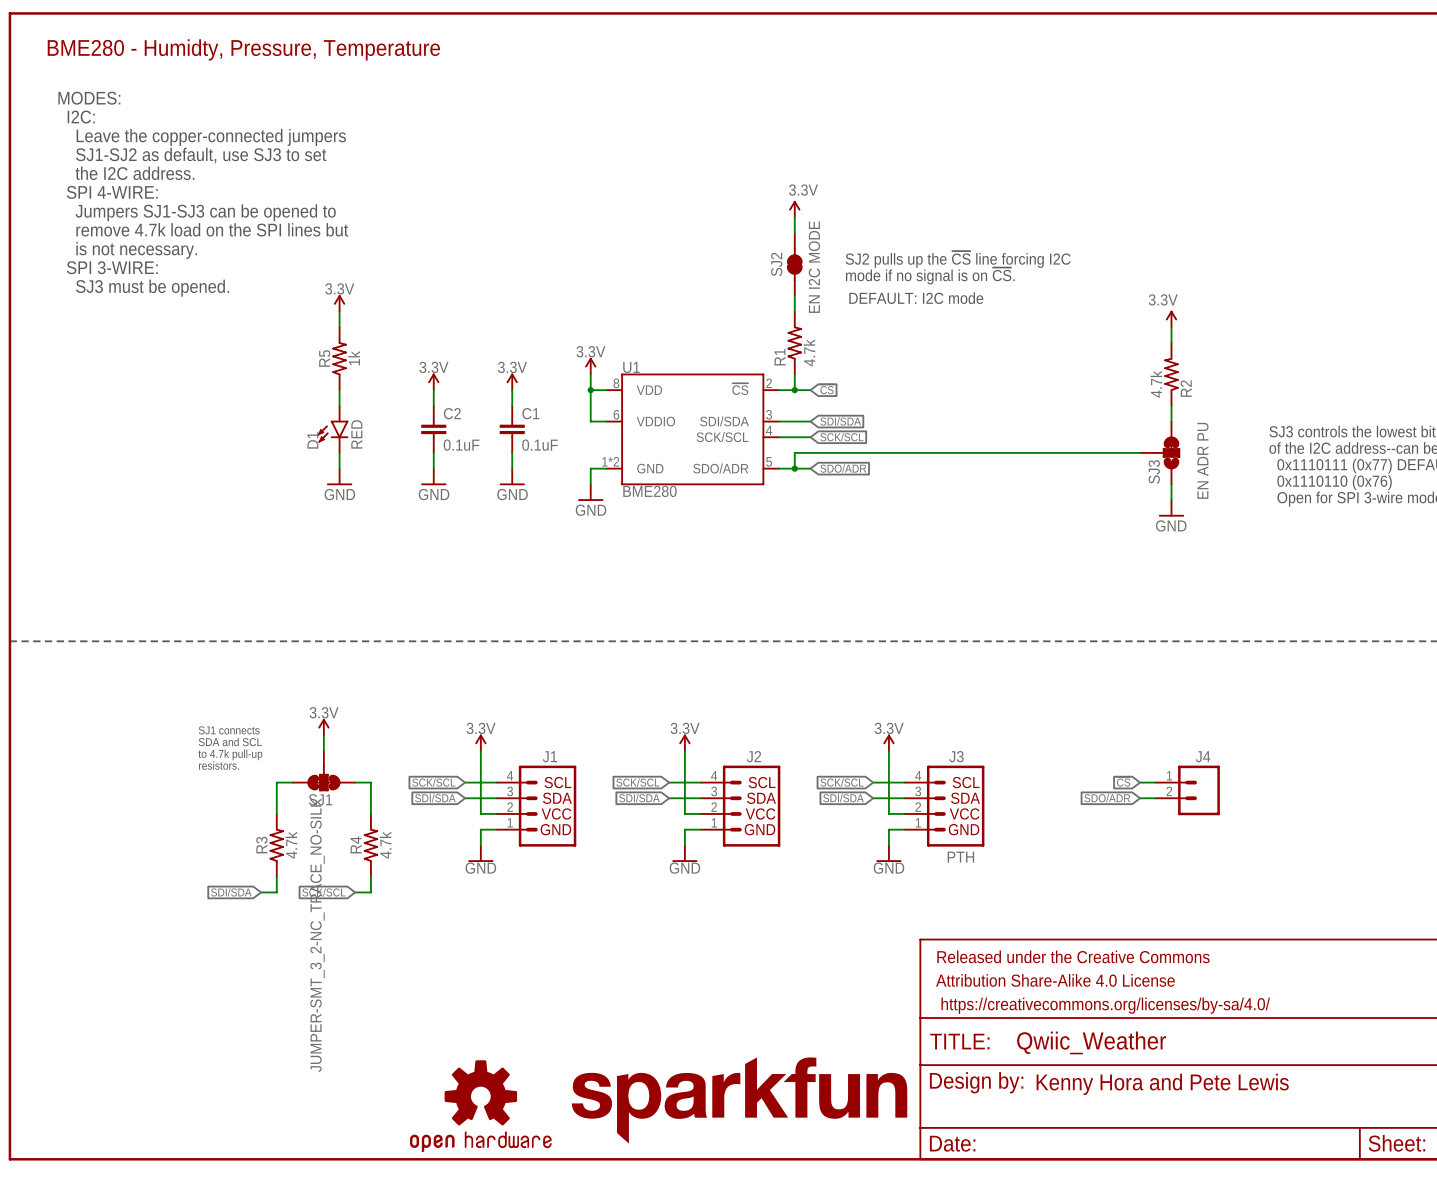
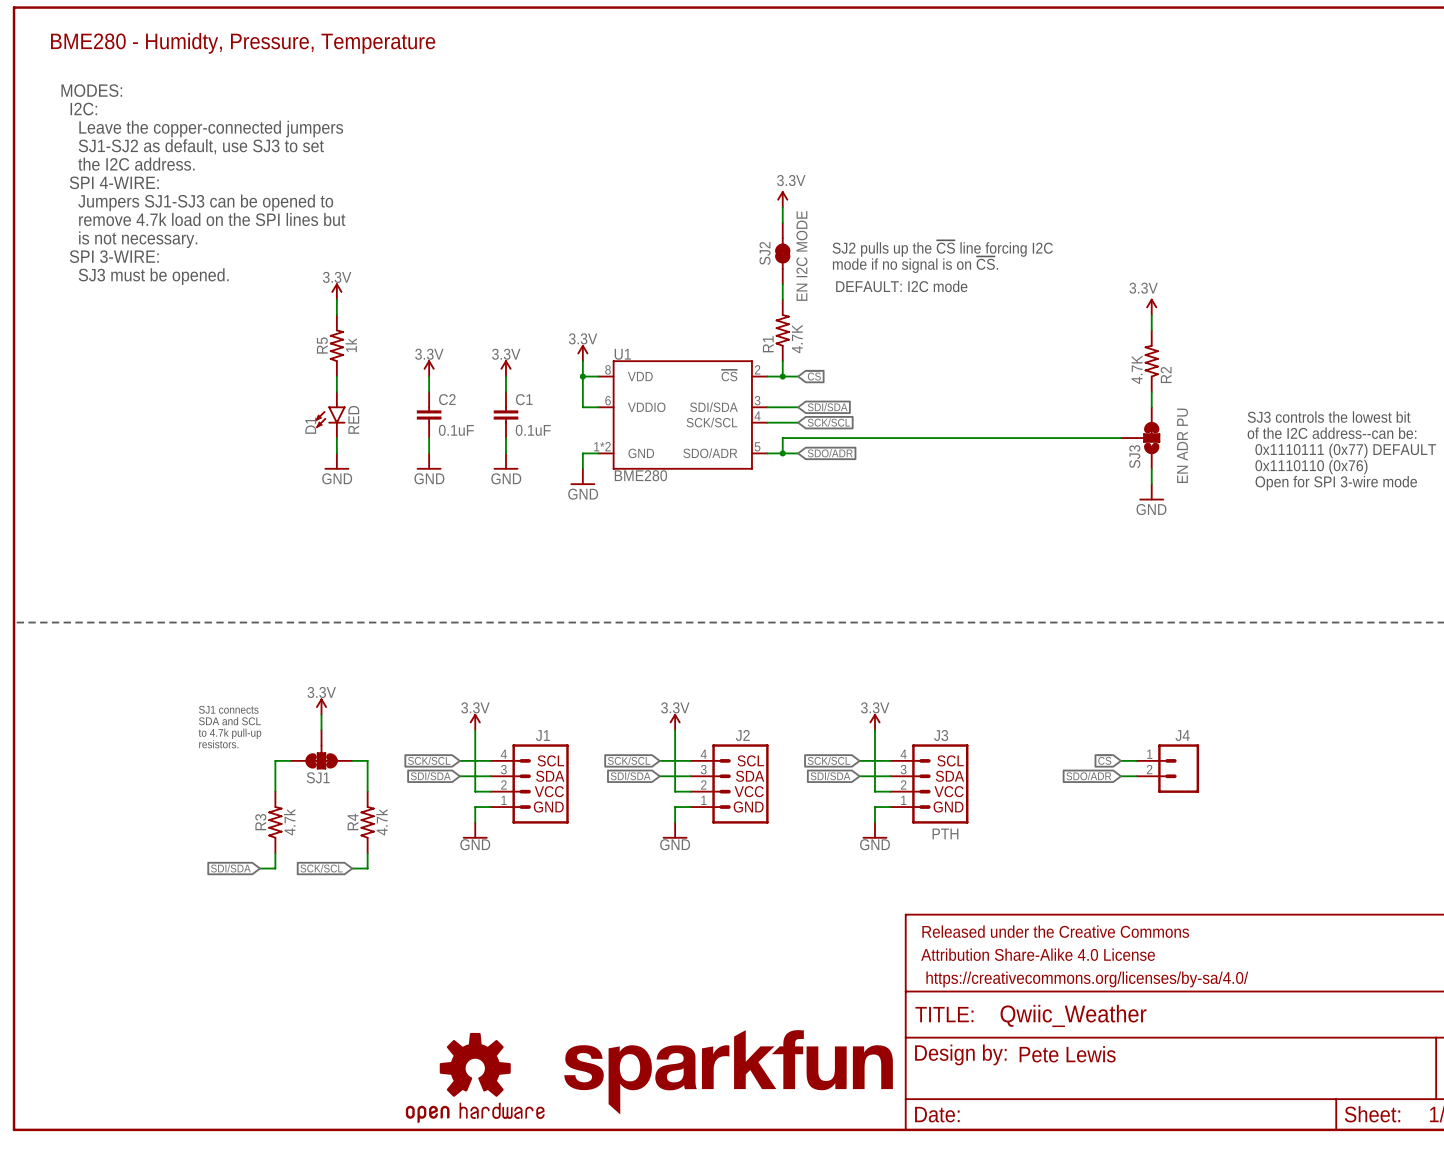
R1 value: 4.7k (809, 352) -> 4.7K (797, 338)
R2 value: 4.7k (1156, 384) -> 4.7K (1137, 369)
SJ1 value: JUMPER-SMT_3_2-NC_TRACE_NO-SILK (317, 935) -> none
text: Kenny Hora and Pete Lewis (1162, 1084) -> Pete Lewis (1067, 1054)

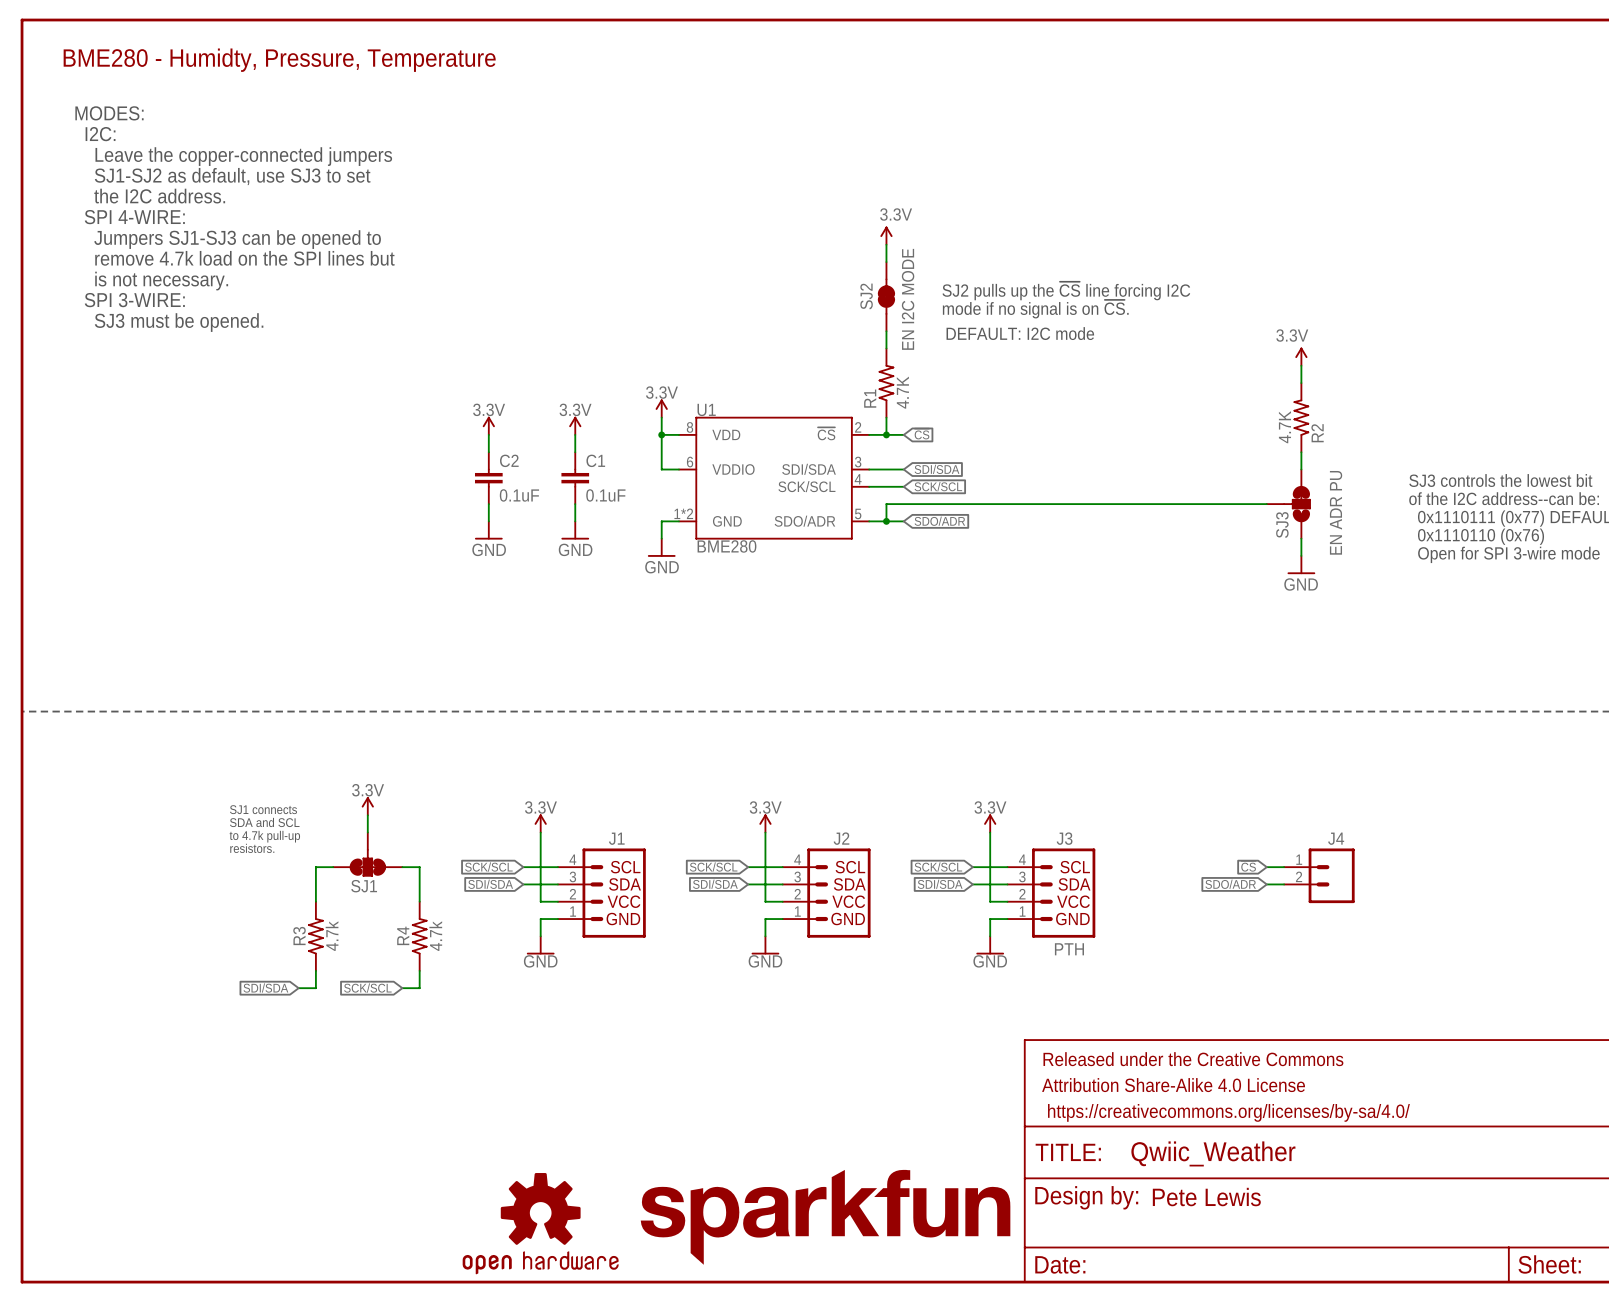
power symbol: 3.3V (336, 291) -> none
wire: (336, 299) (336, 315) -> none
R5: 1k (336, 345) -> none
wire: (336, 376) (336, 391) -> none
D1: RED (330, 414) -> none
wire: (336, 438) (336, 453) -> none
power symbol: GND (336, 461) -> none

